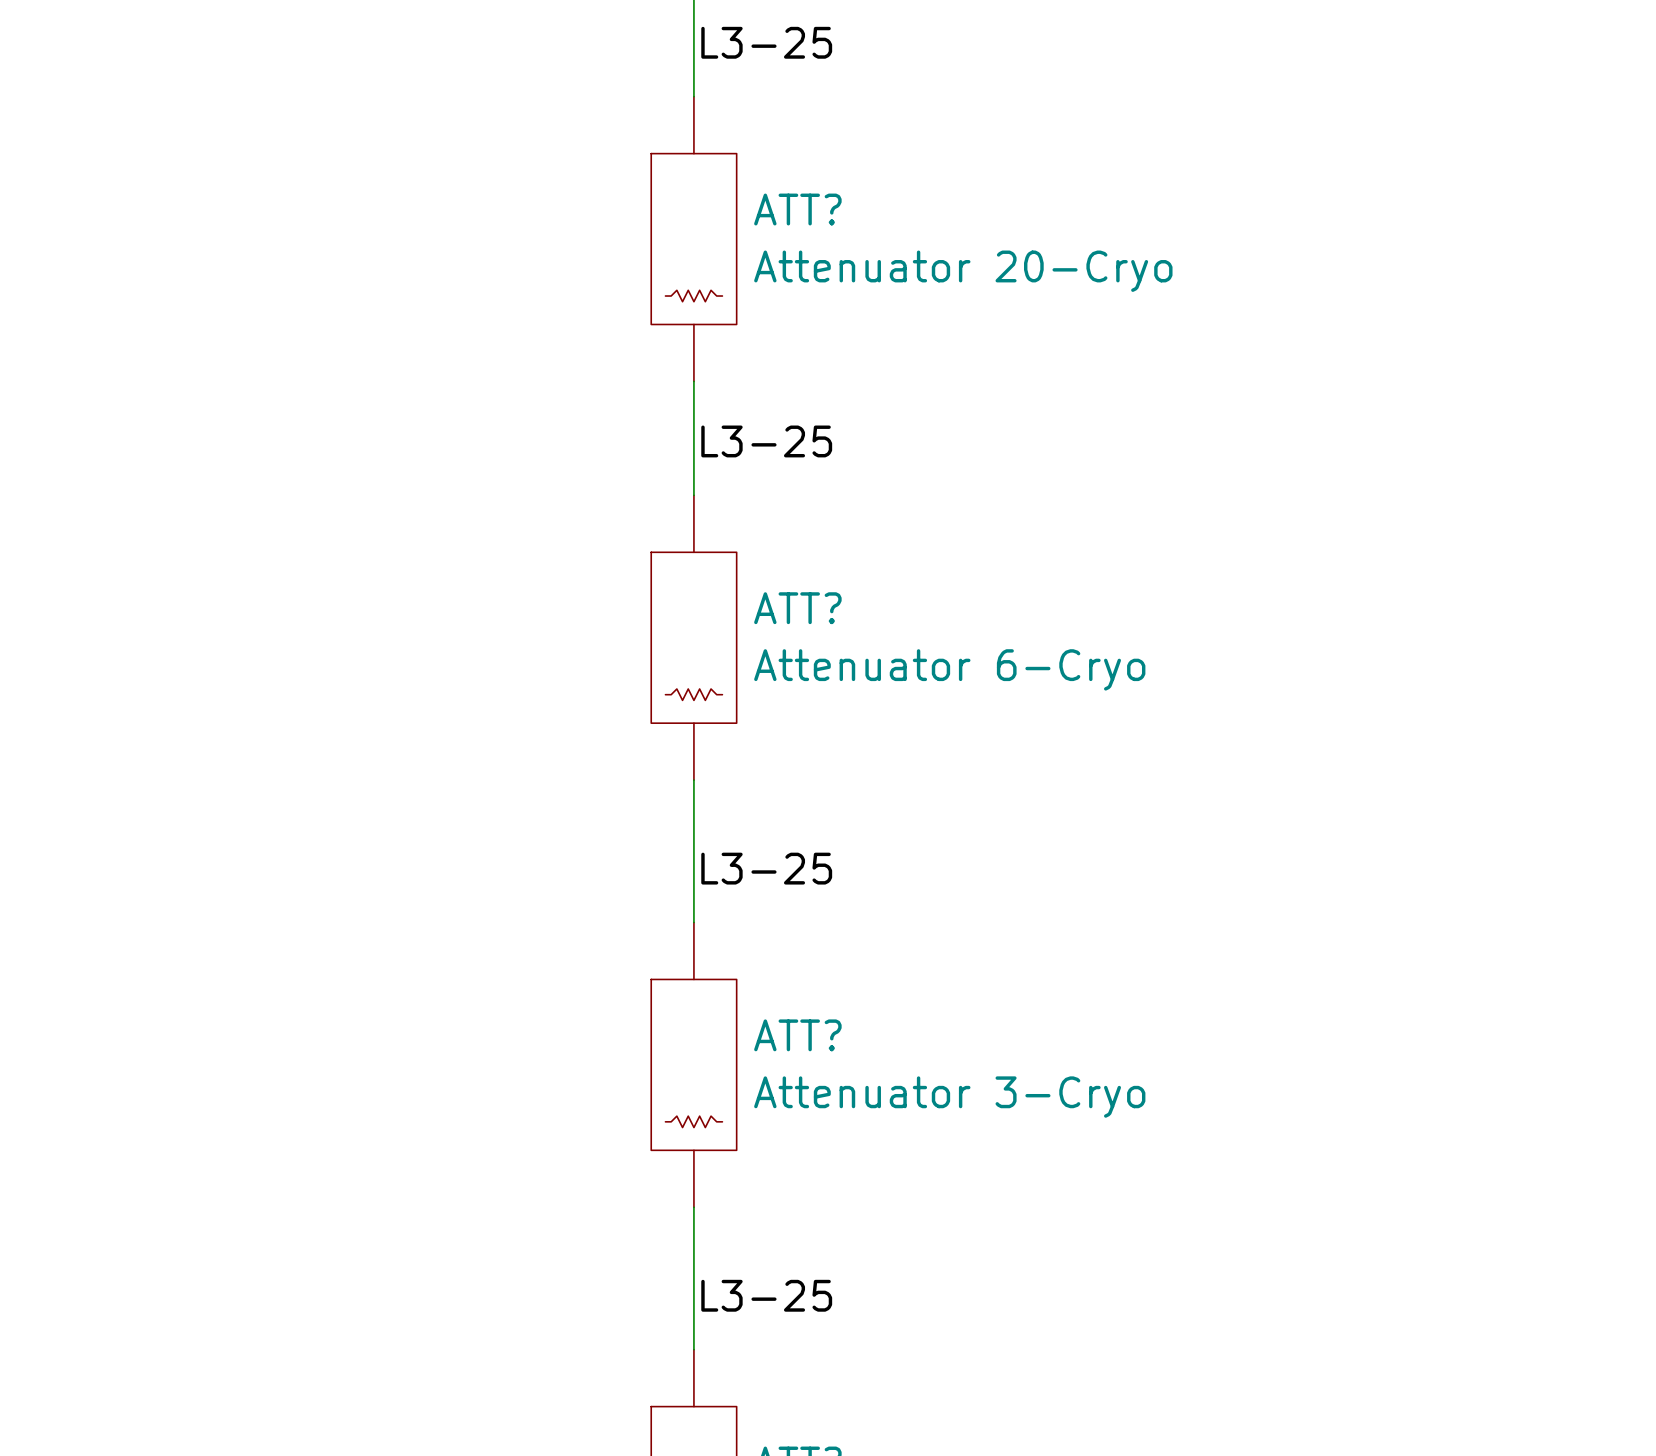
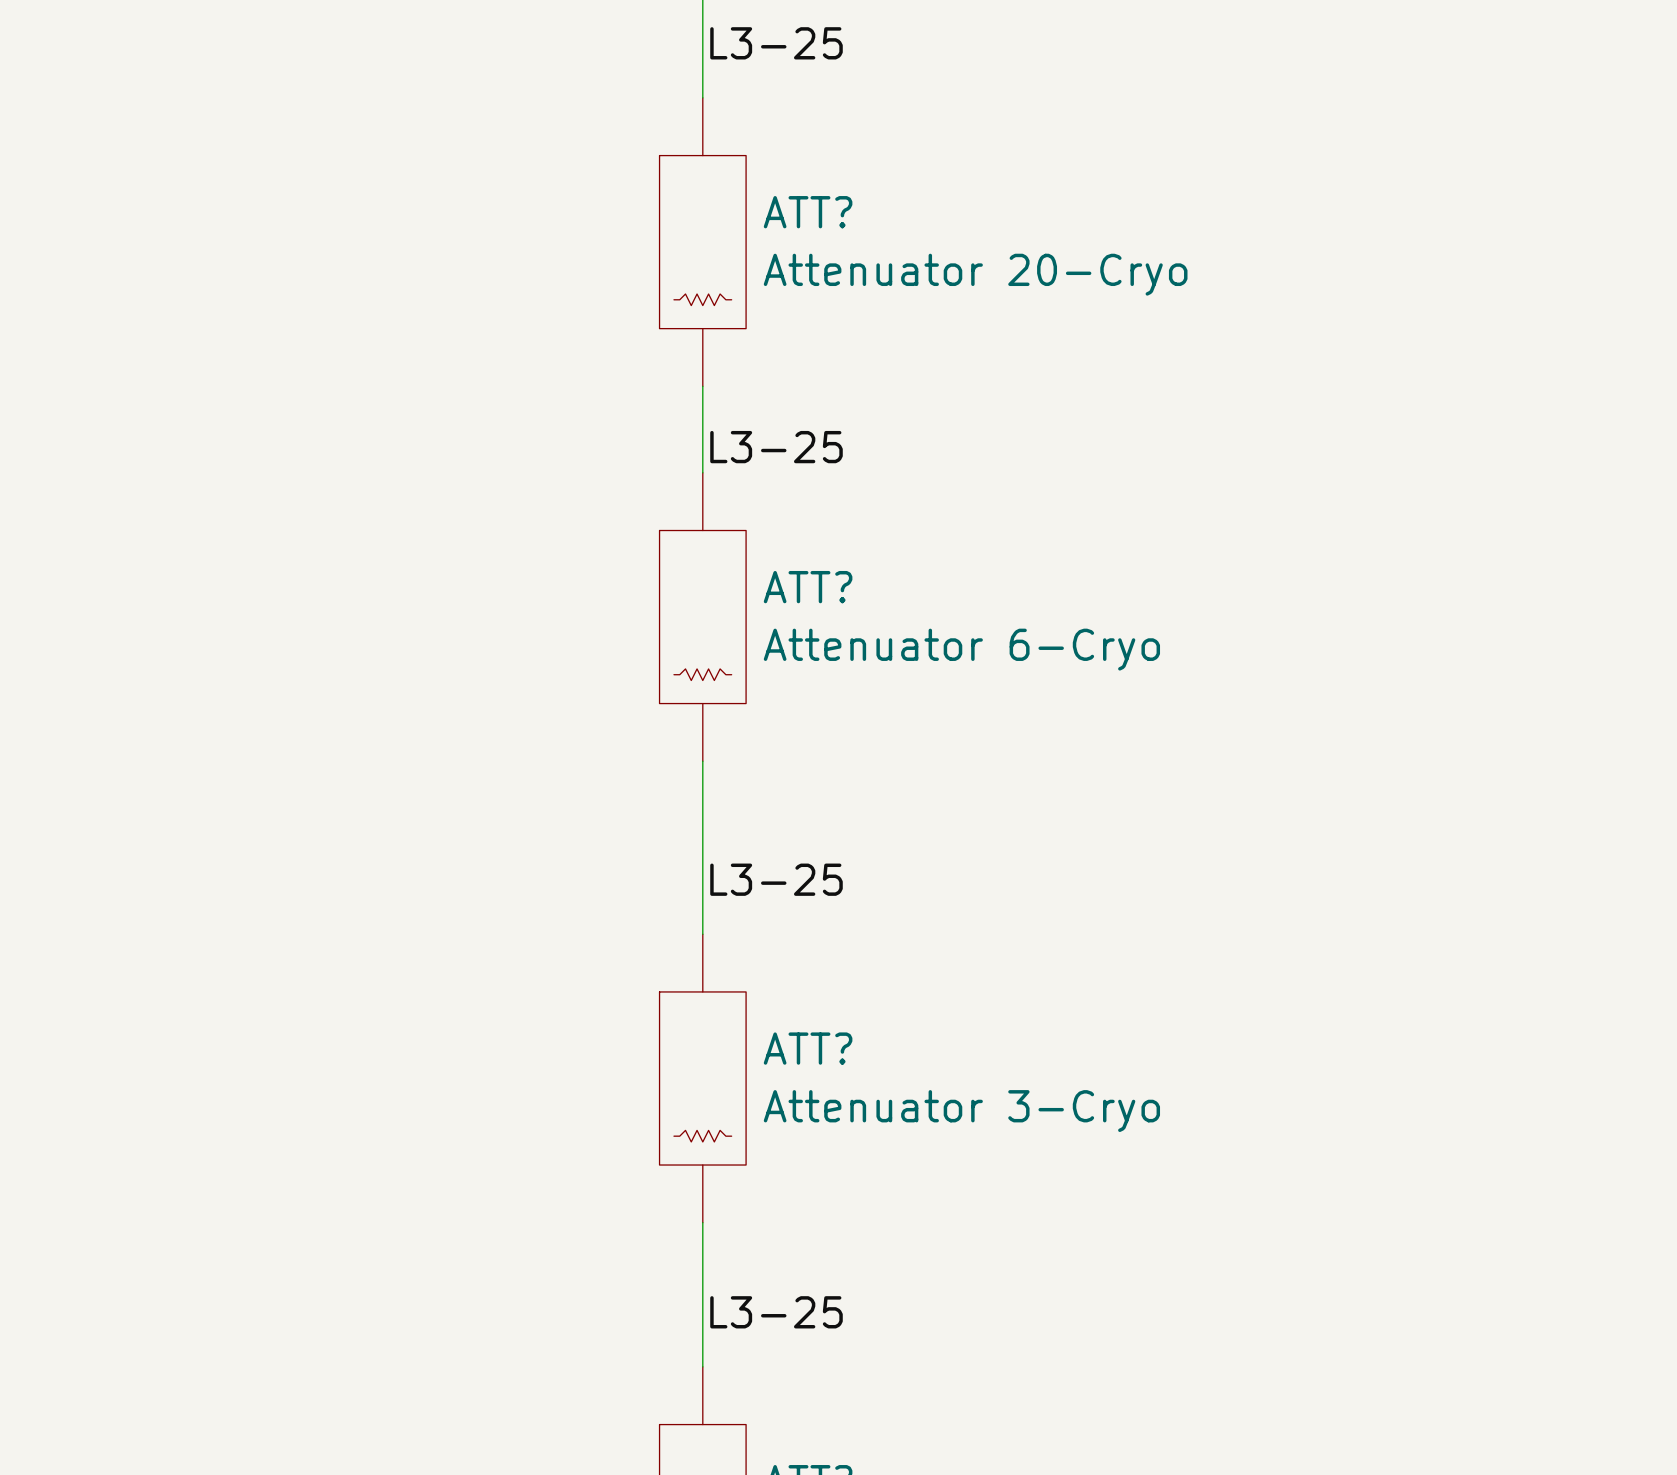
ATT? position: (693, 637) -> (702, 617)

